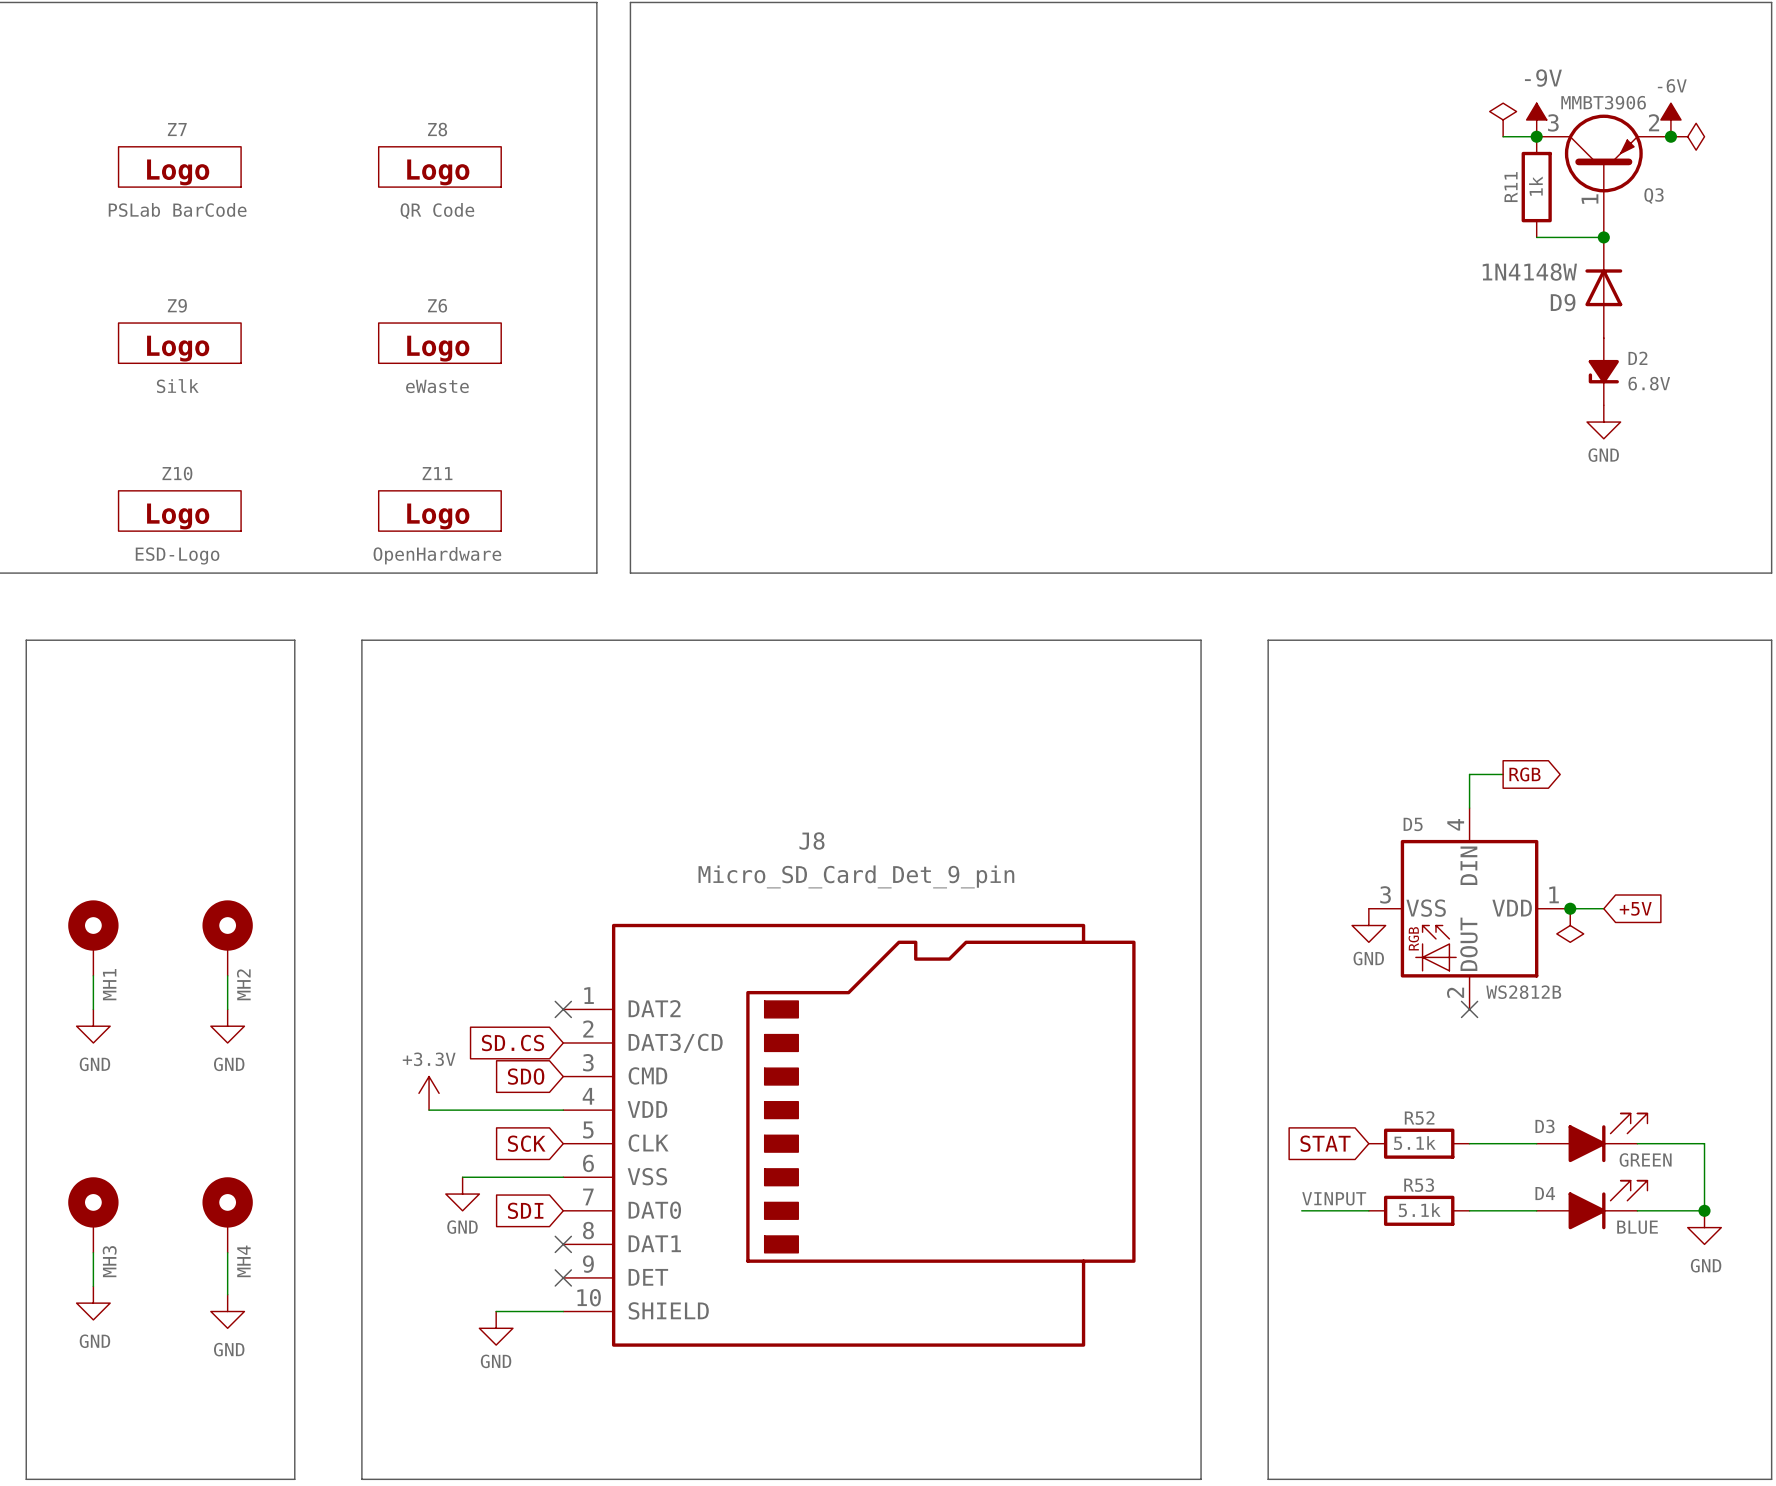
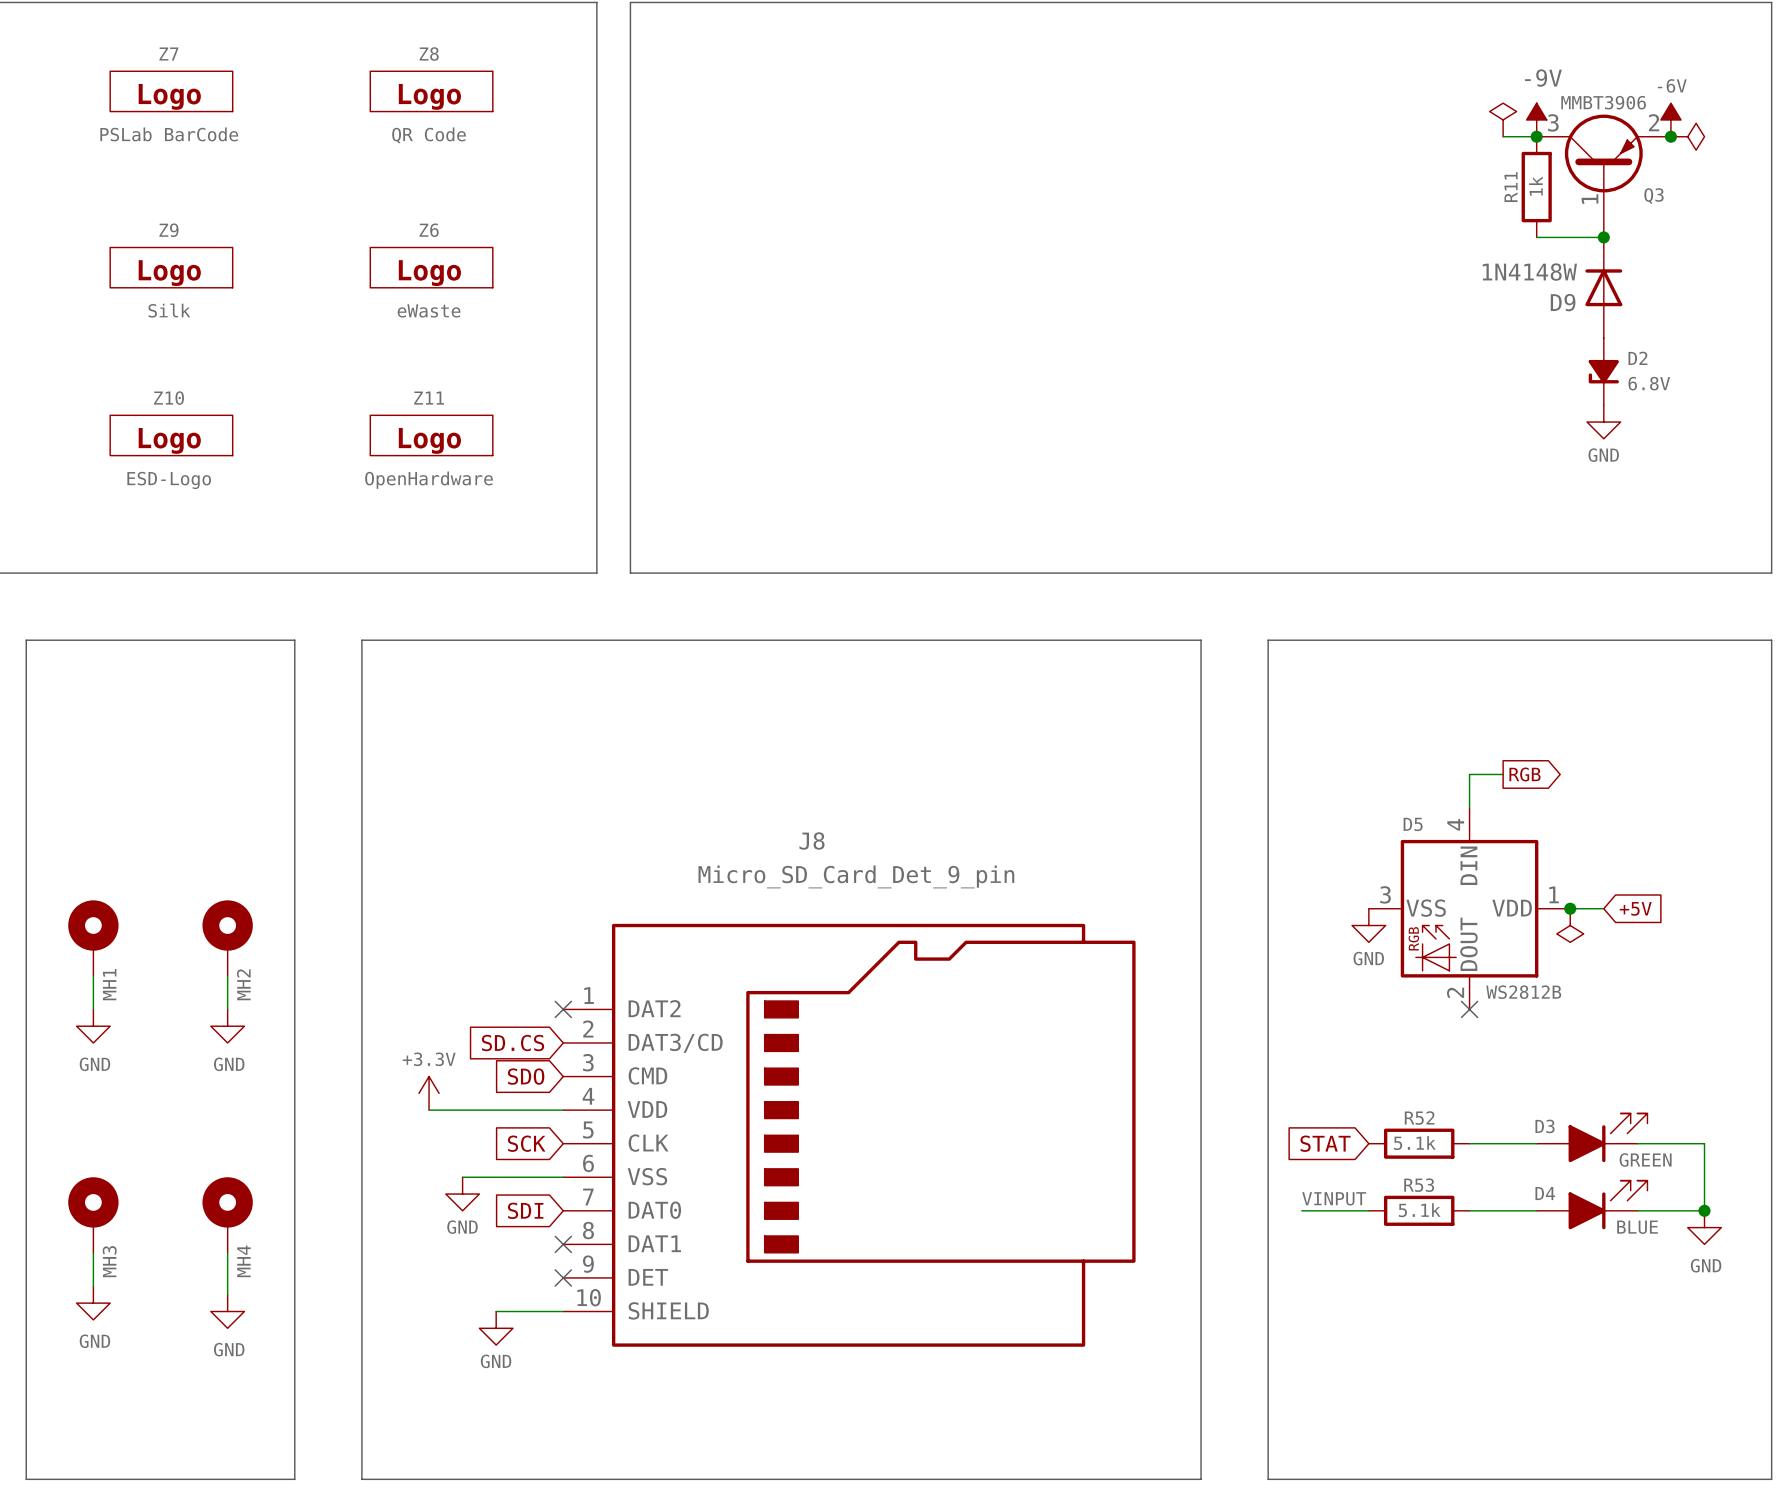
Z7 position: (179, 166) -> (171, 91)
Z8 position: (439, 166) -> (431, 91)
Z9 position: (179, 343) -> (171, 267)
Z6 position: (439, 343) -> (431, 267)
Z10 position: (179, 510) -> (171, 435)
Z11 position: (439, 510) -> (431, 435)

